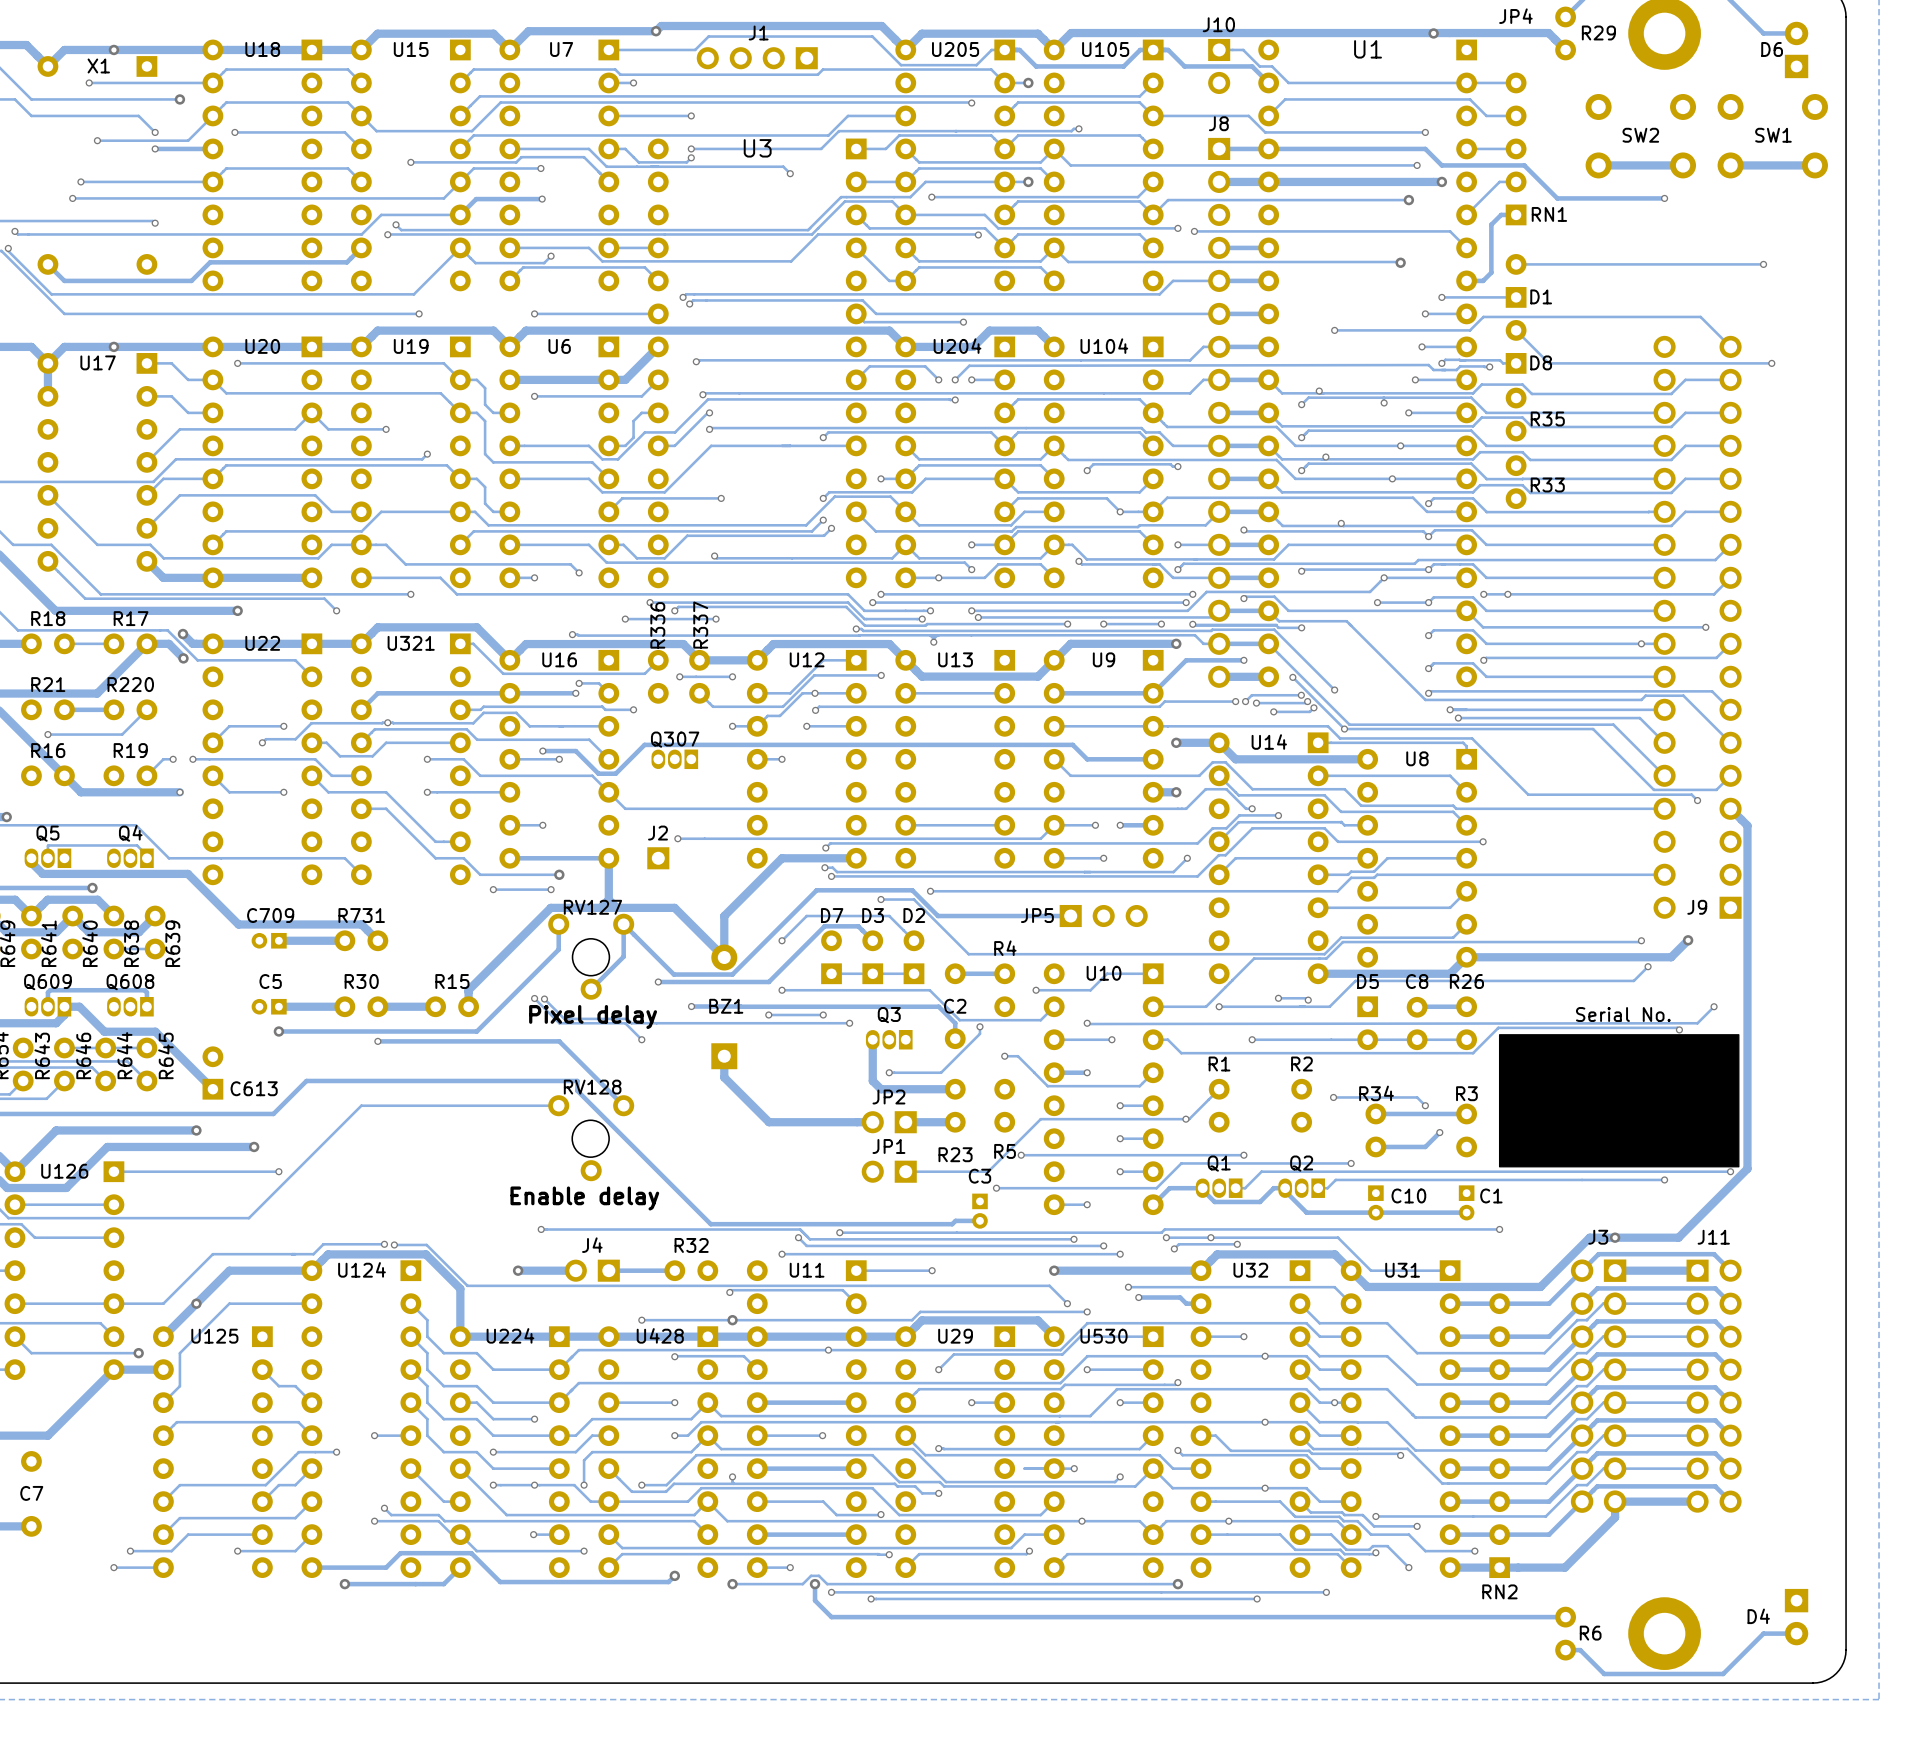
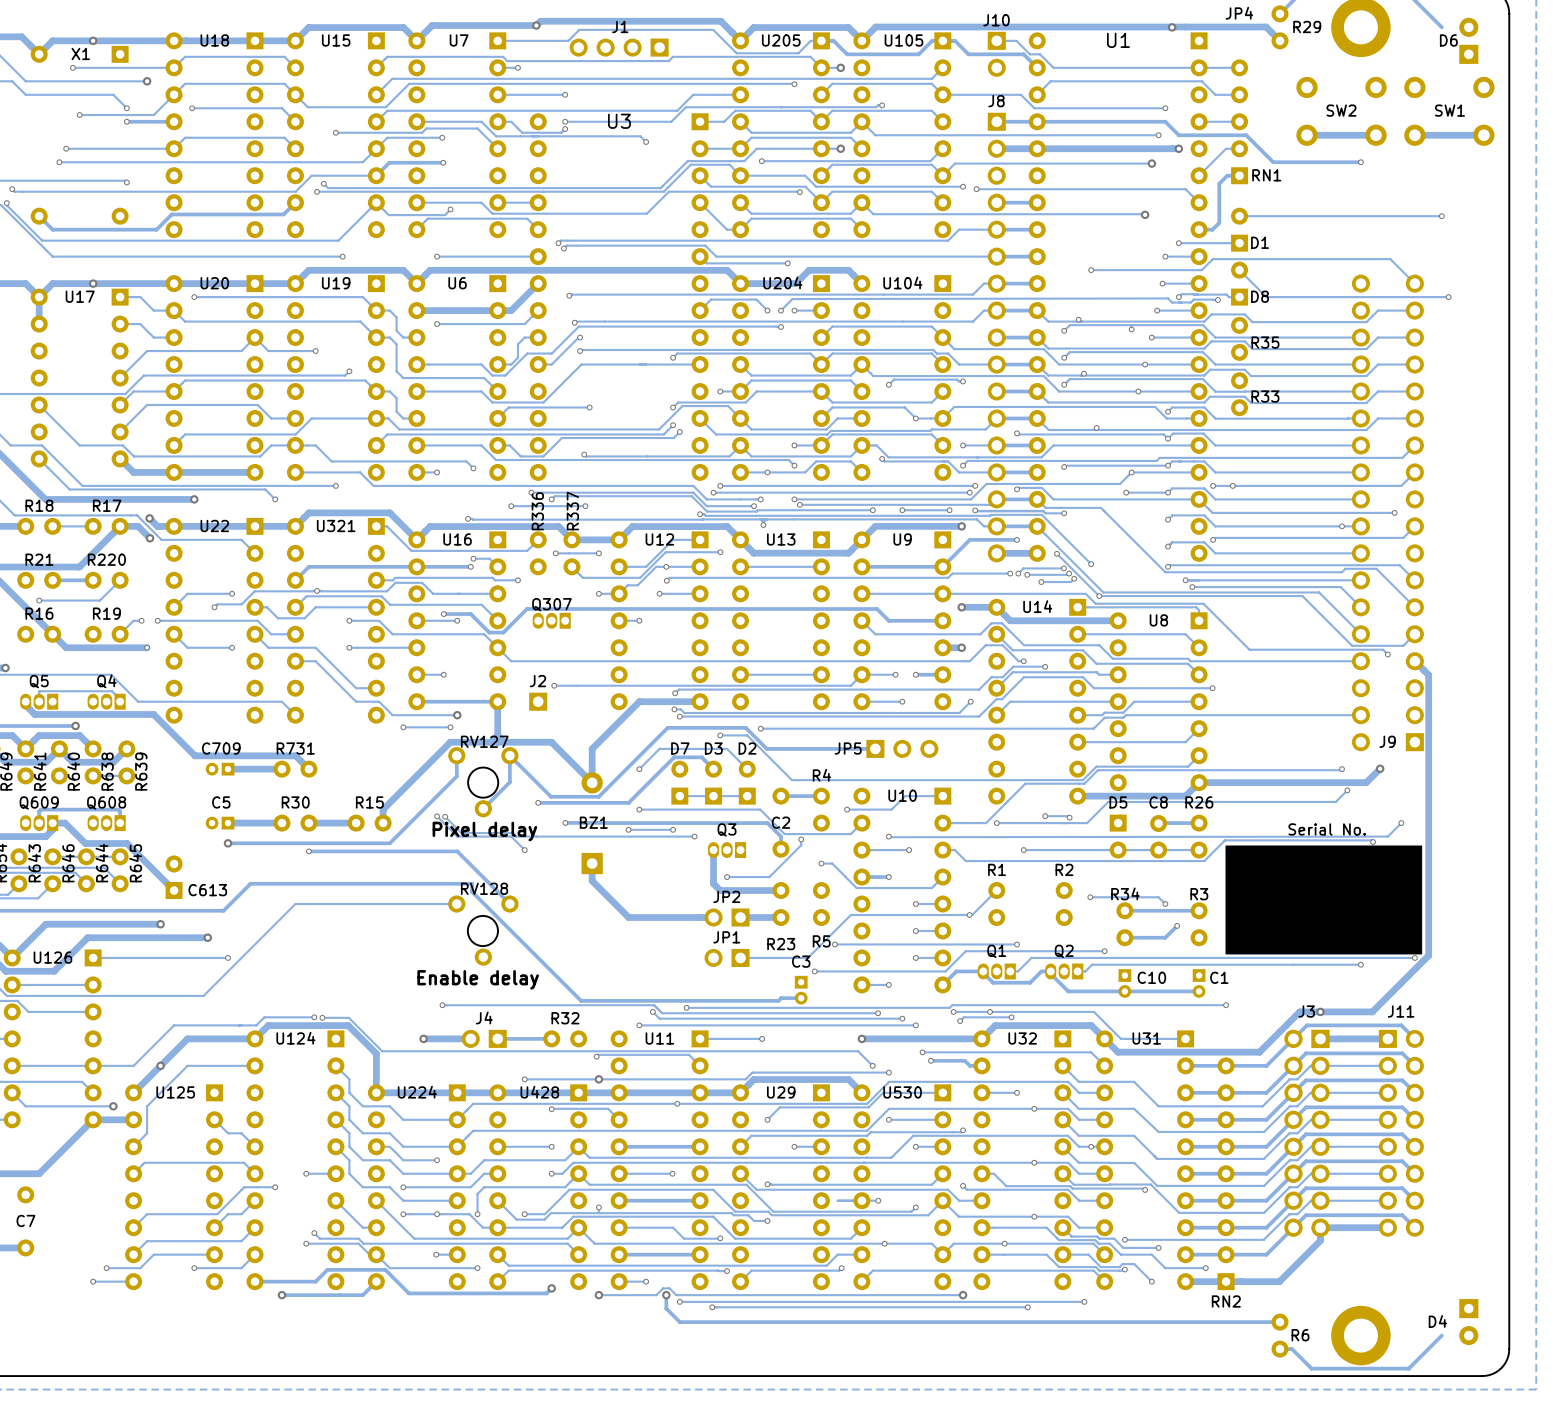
track: (1796, 33) (1763, 33) -> none
track: (1796, 1633) (1763, 1633) -> none

